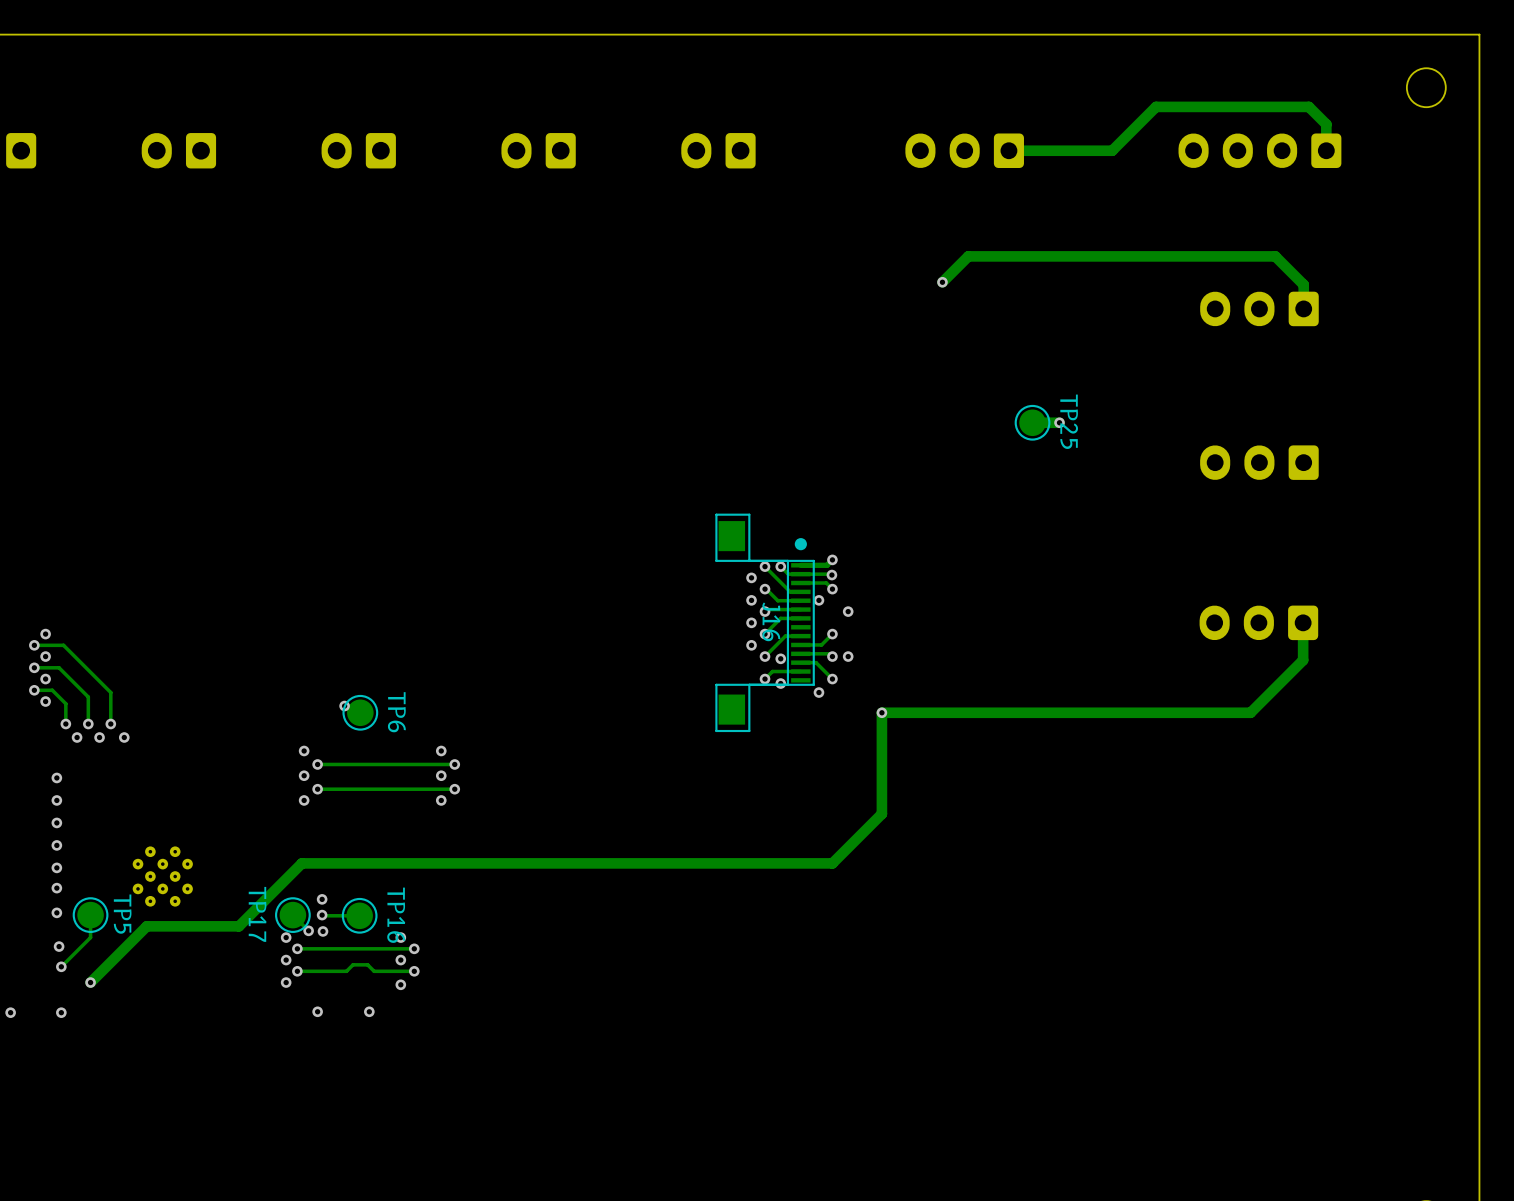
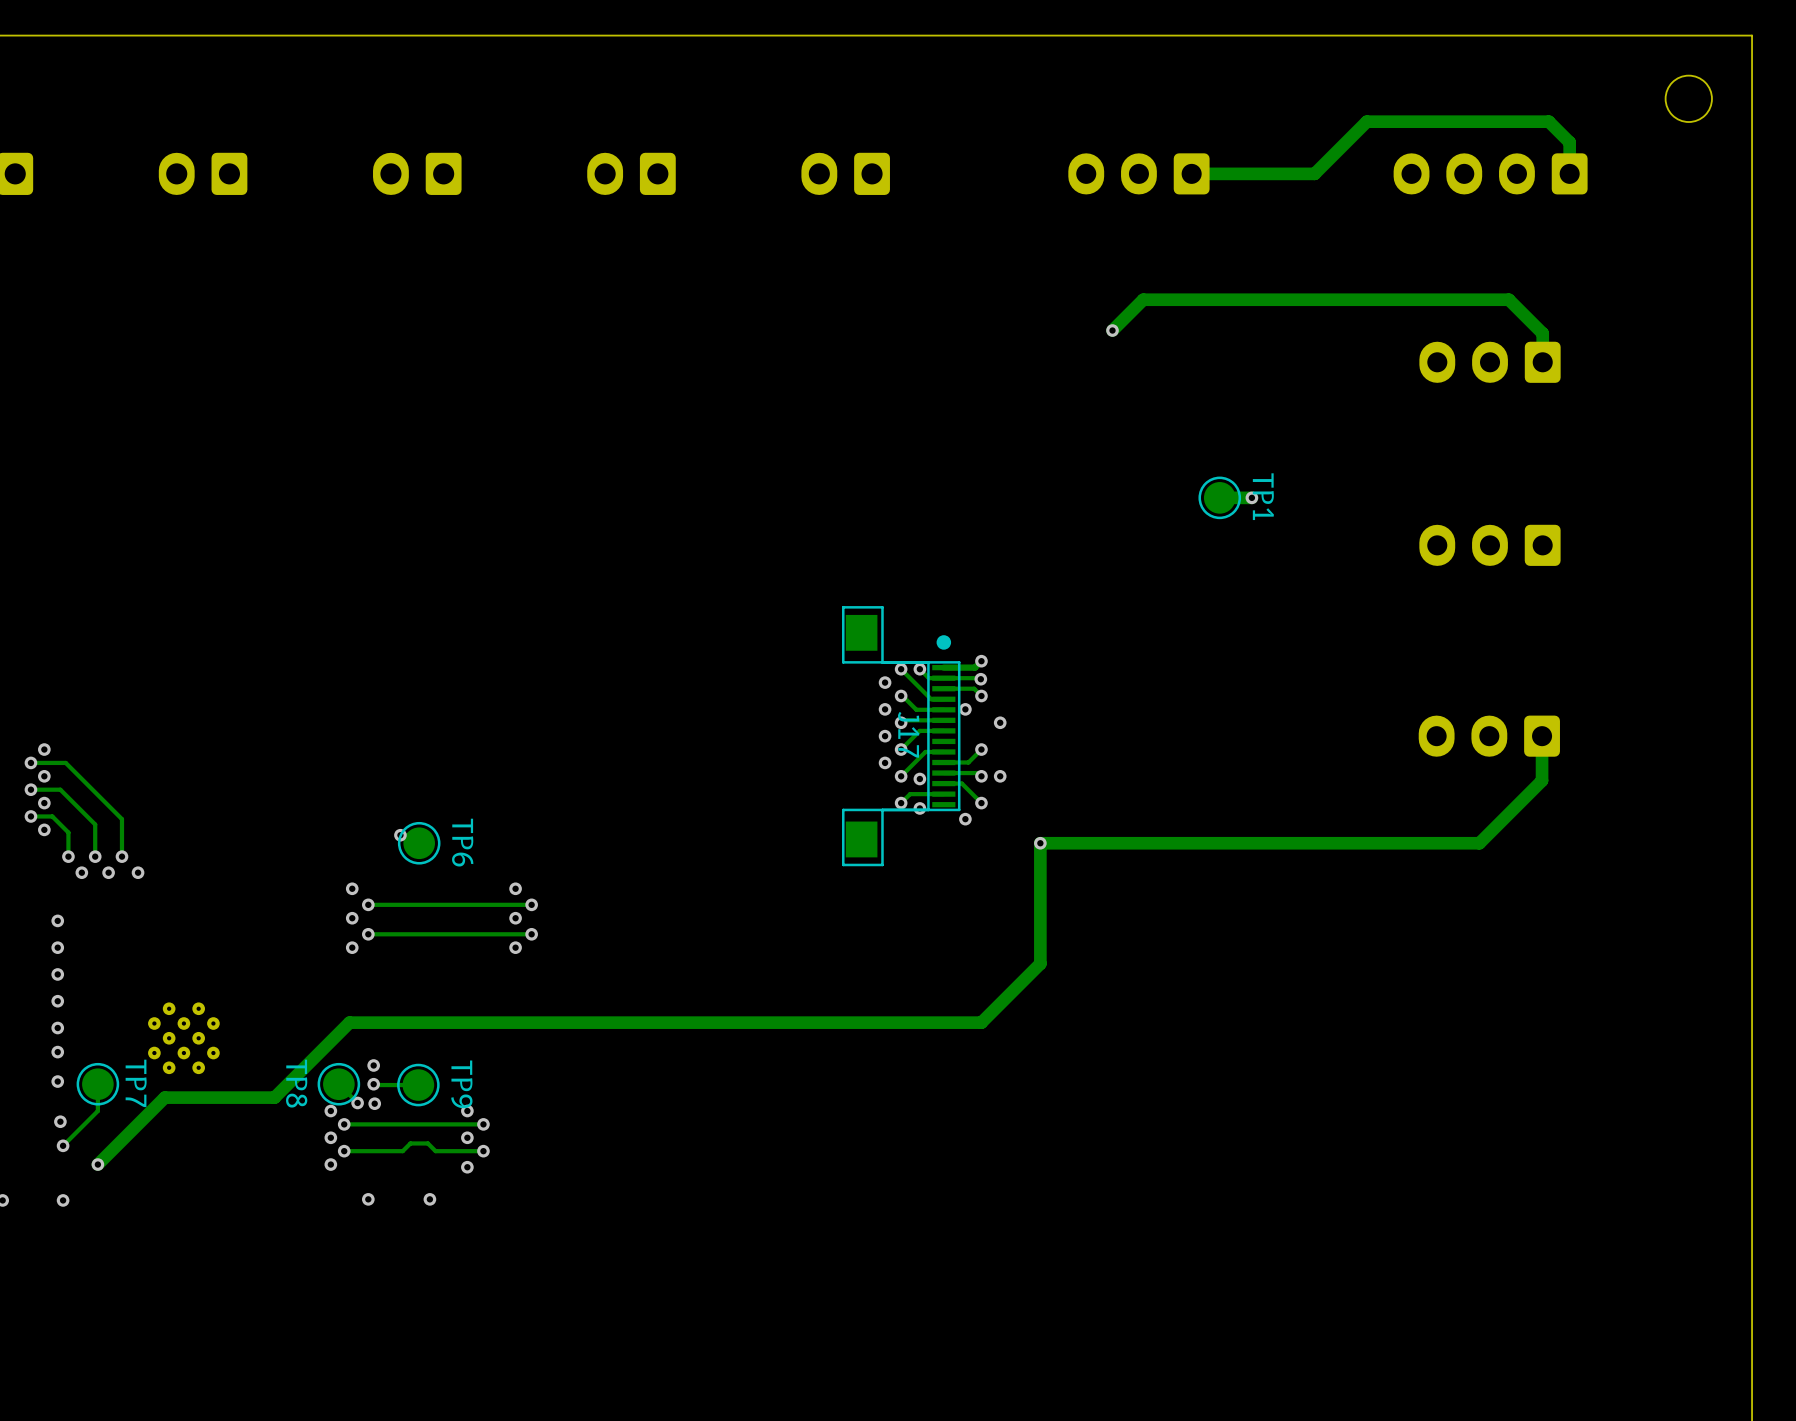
TP25 name: TP25 (1069, 421) -> TP1 (1263, 496)
J16 name: J16 (771, 621) -> J17 (908, 734)
TP5 name: TP5 (122, 914) -> TP7 (136, 1083)
TP17 name: TP17 (257, 914) -> TP8 (296, 1083)
TP16 name: TP16 (396, 915) -> TP9 (461, 1084)

